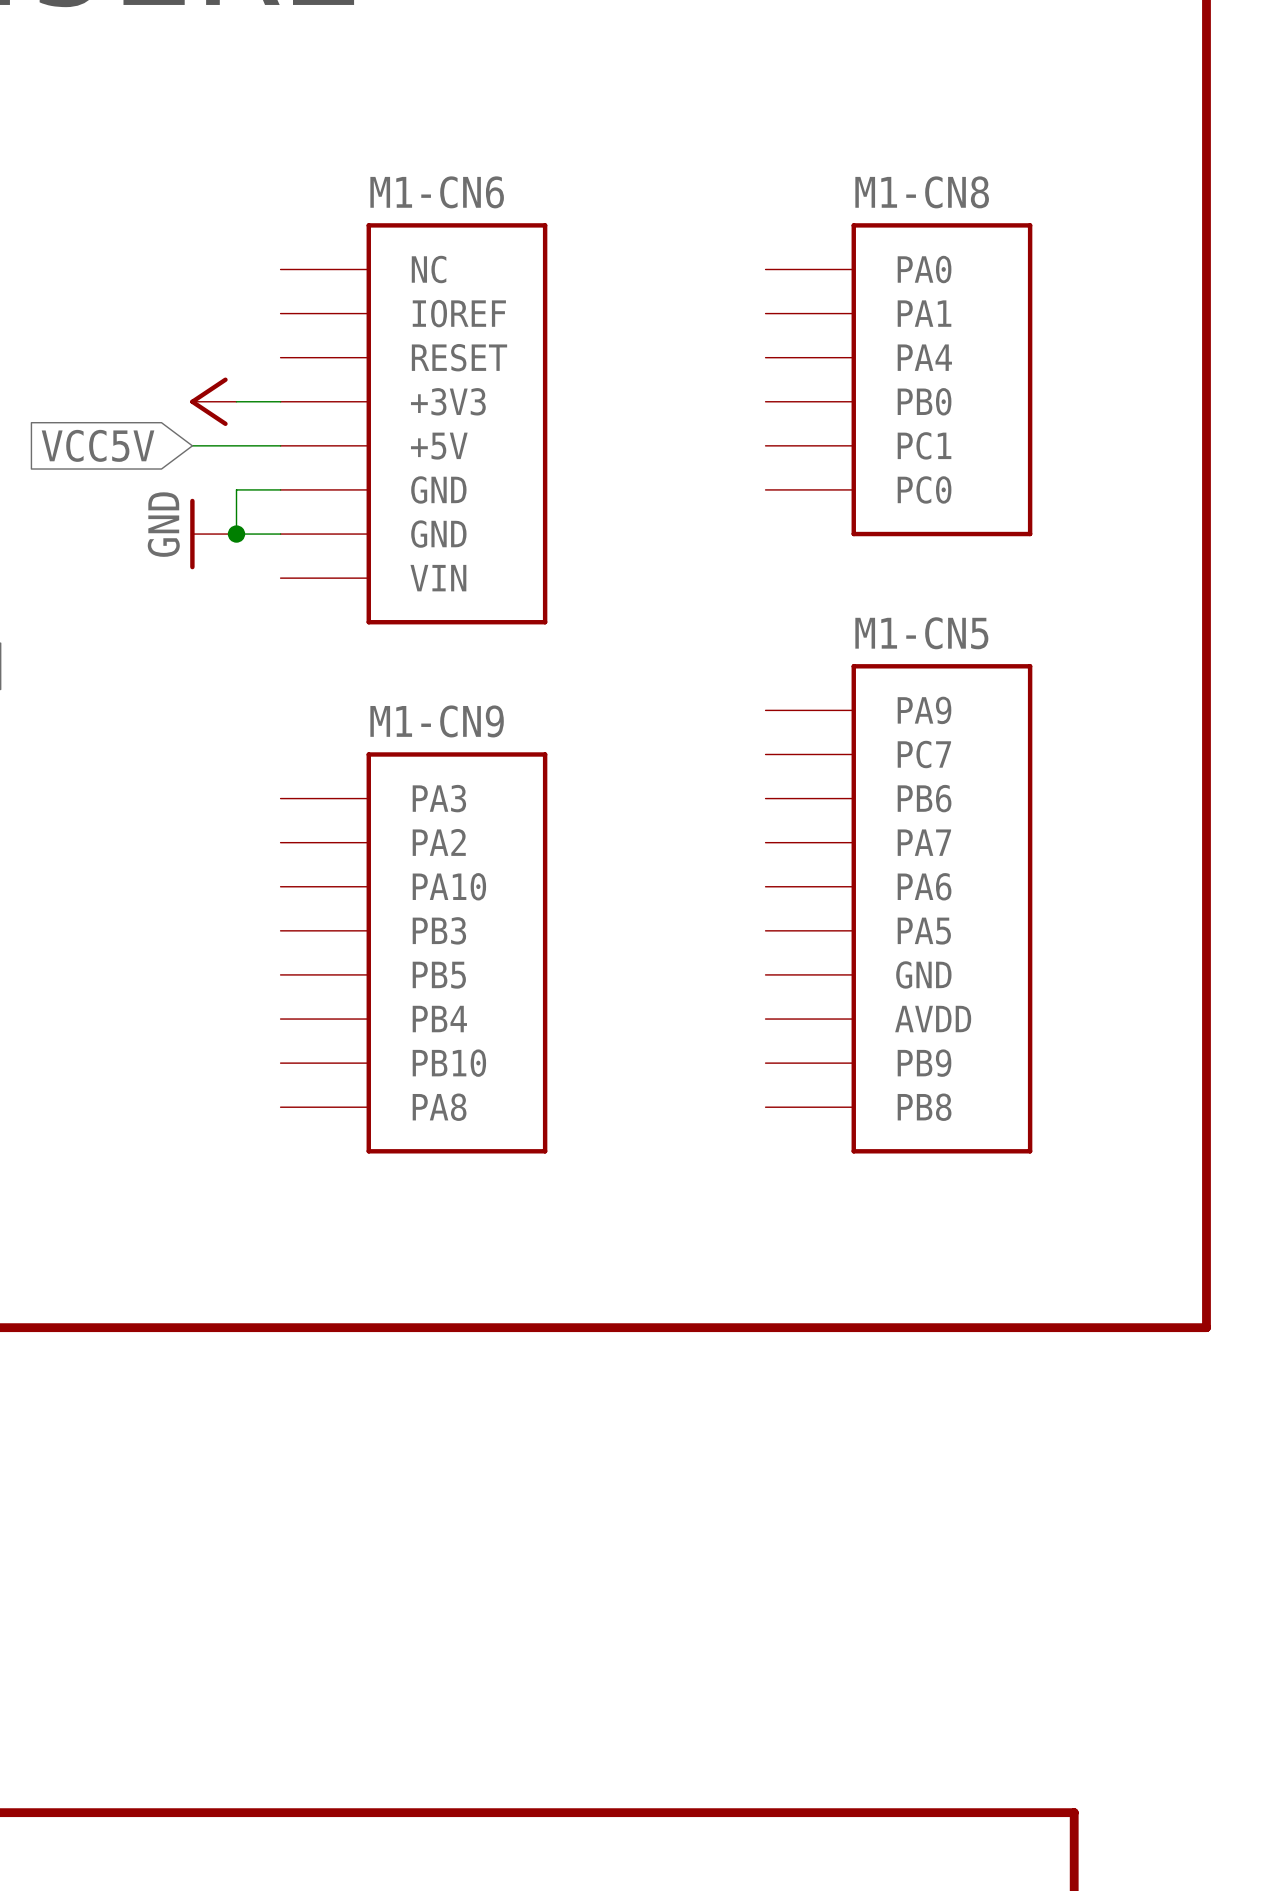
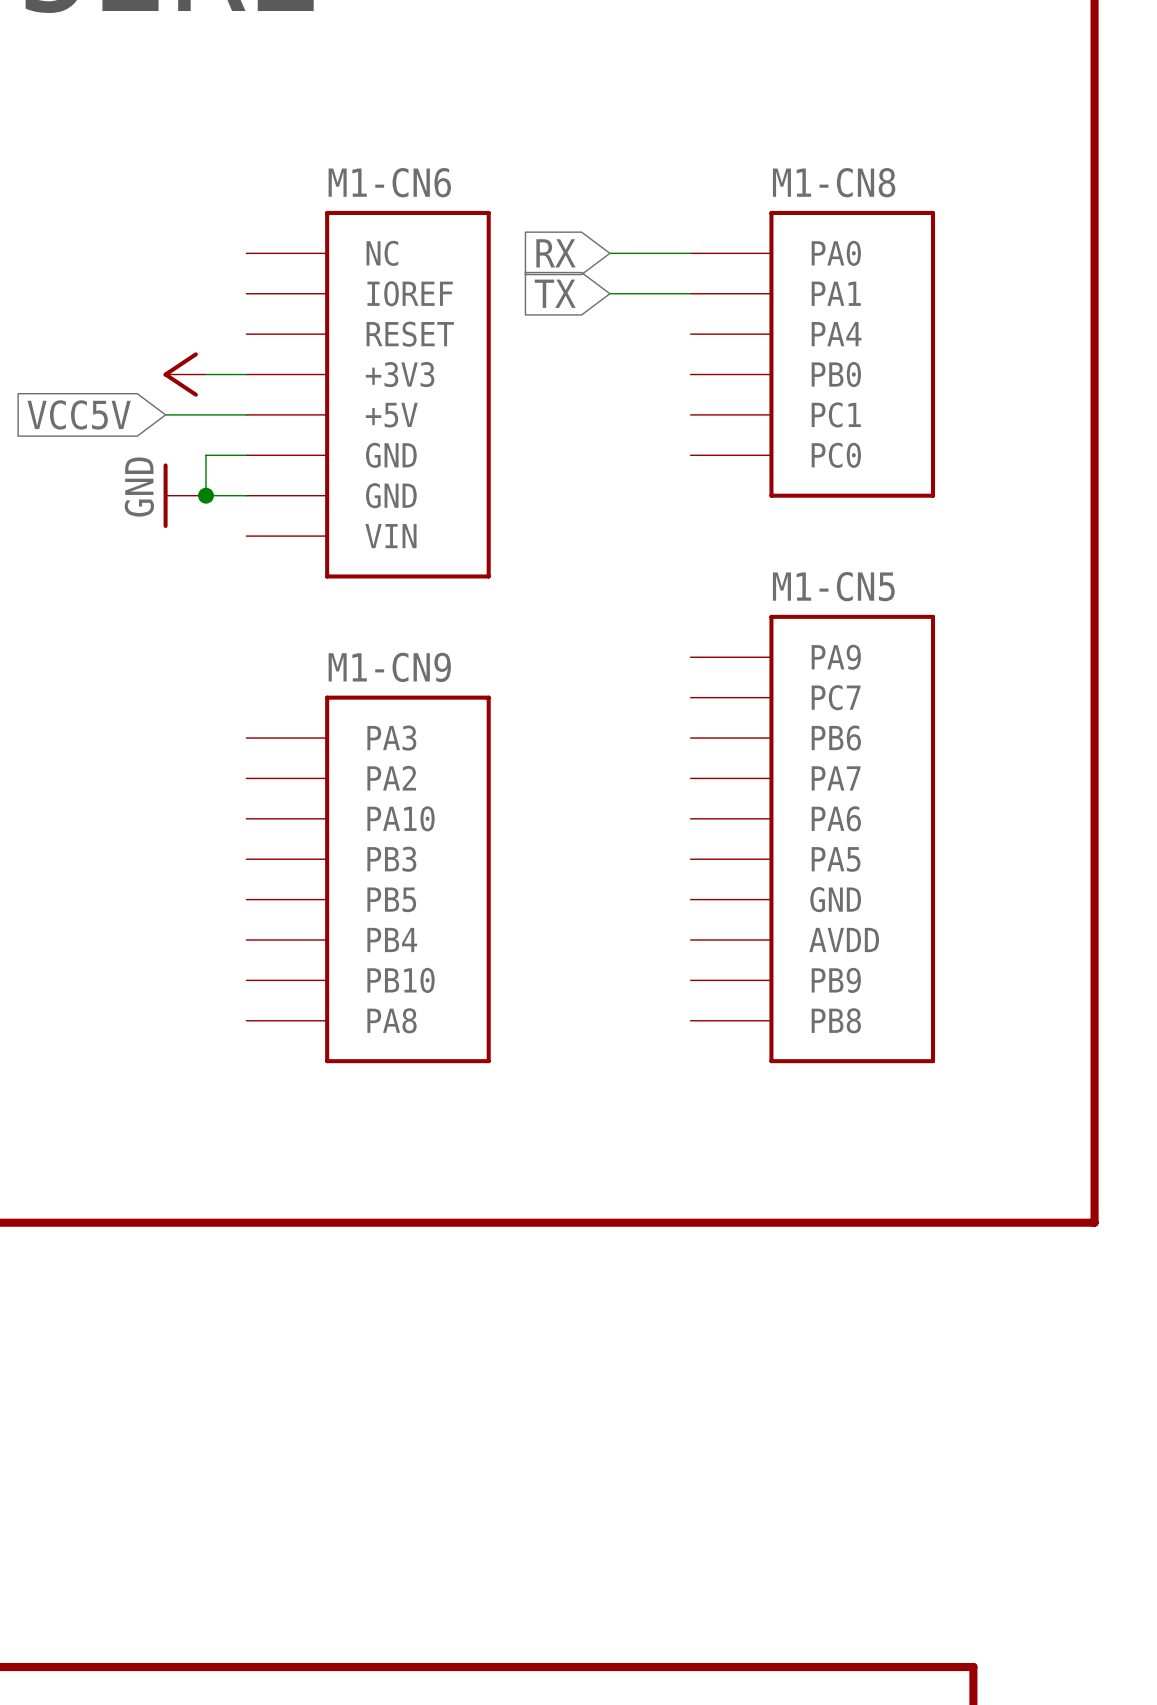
global label: none -> RX (556, 253)
wire: none -> (609, 253) (690, 253)
global label: none -> TX (555, 293)
wire: none -> (609, 293) (690, 293)

